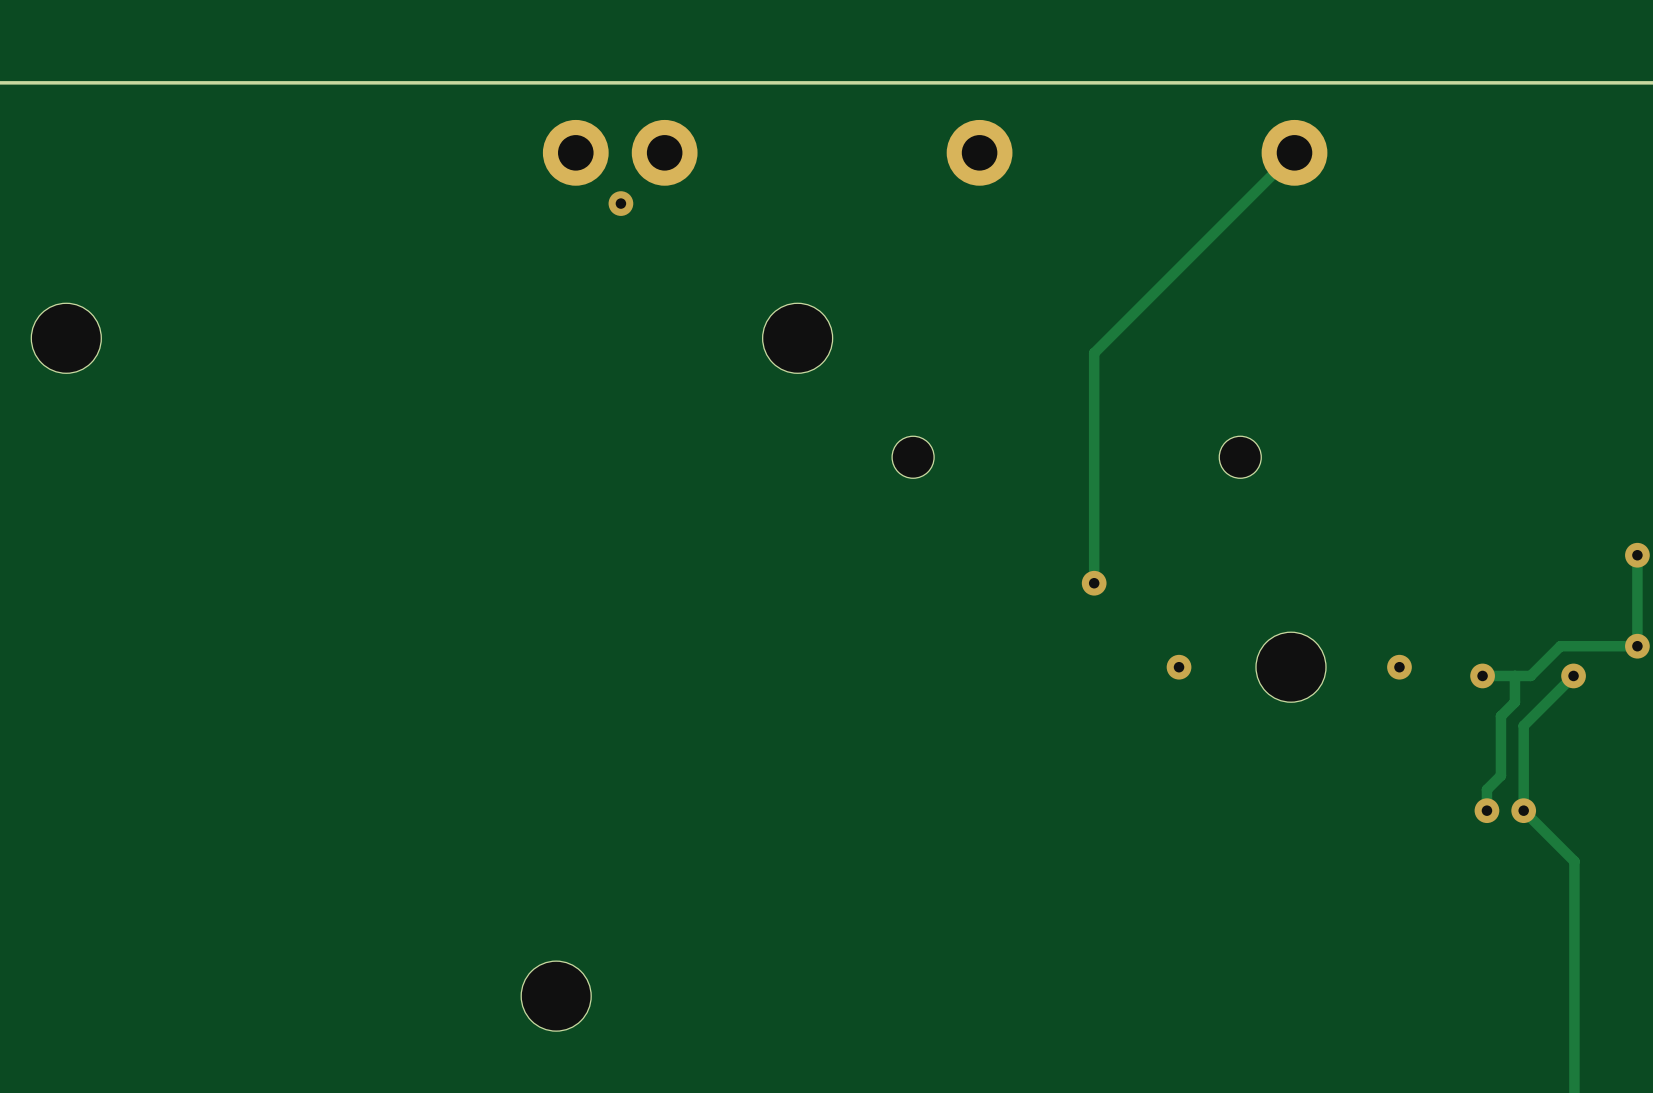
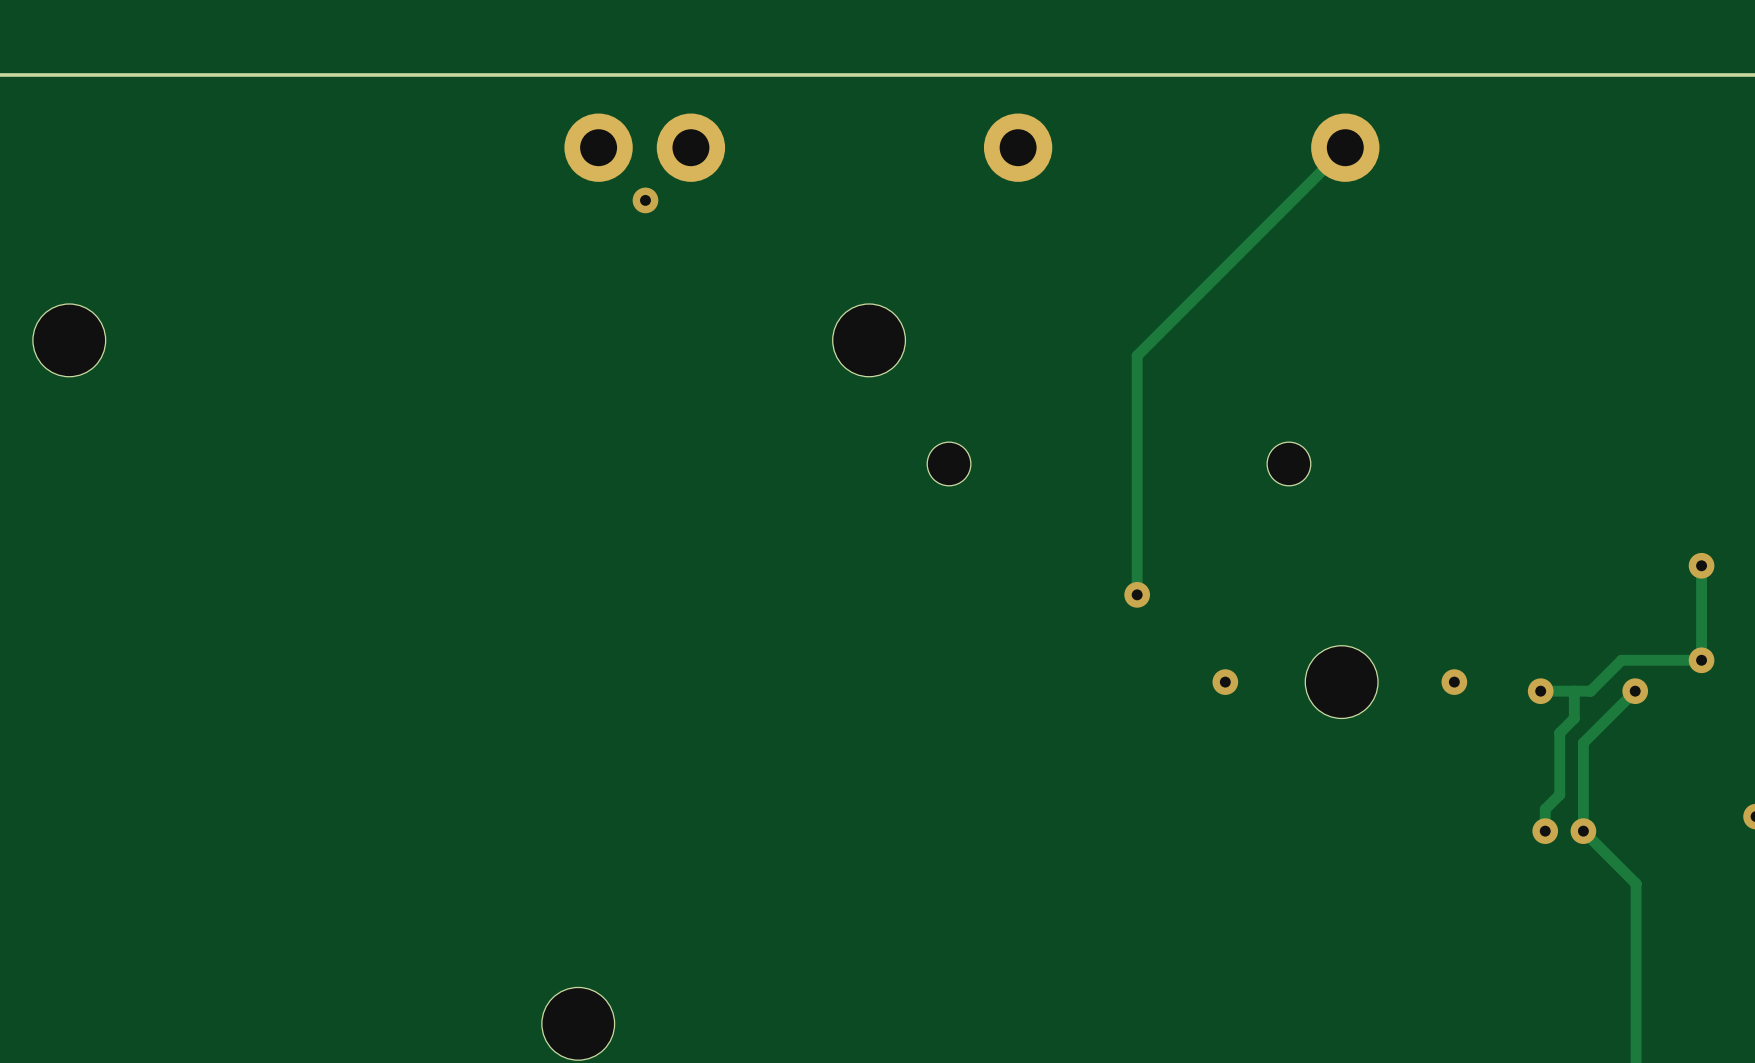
hole position: (797, 338) -> (869, 340)

